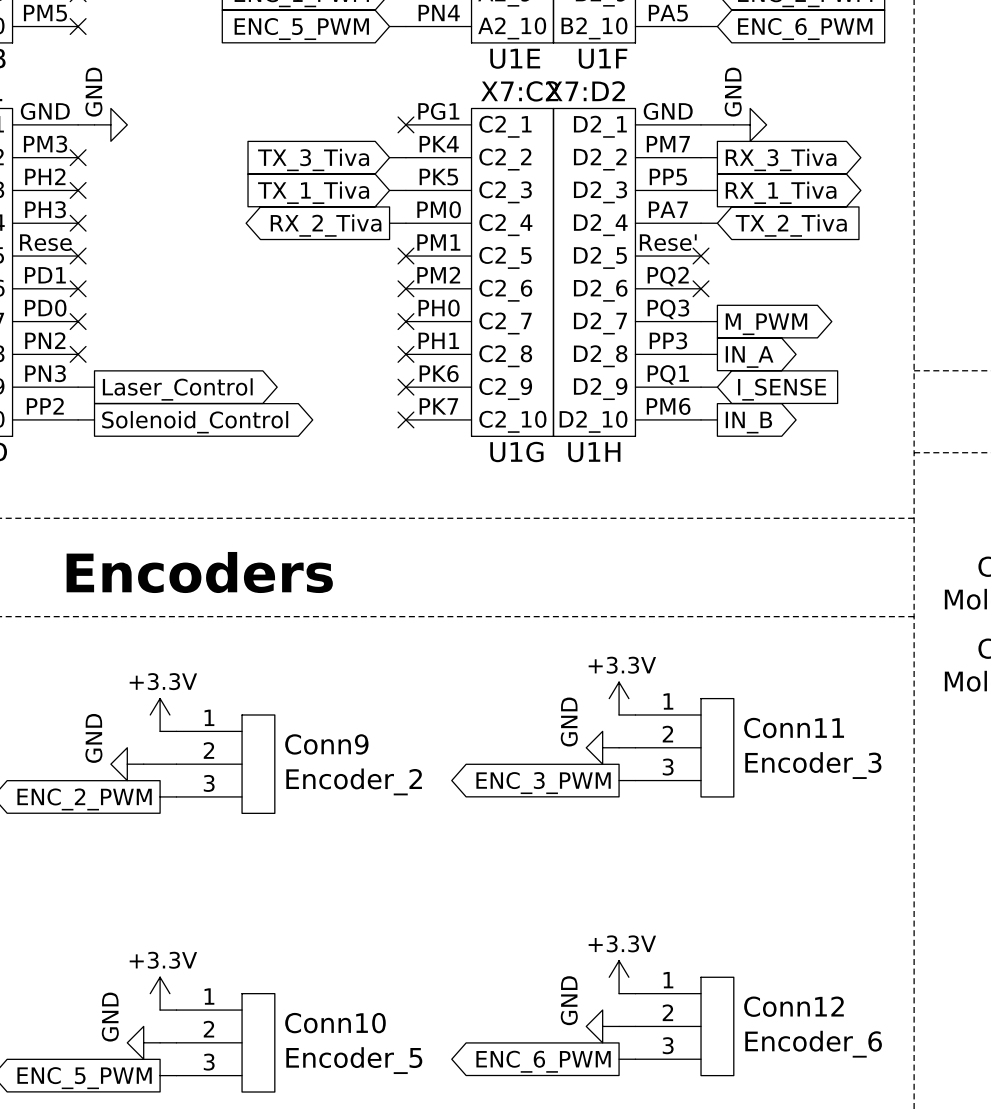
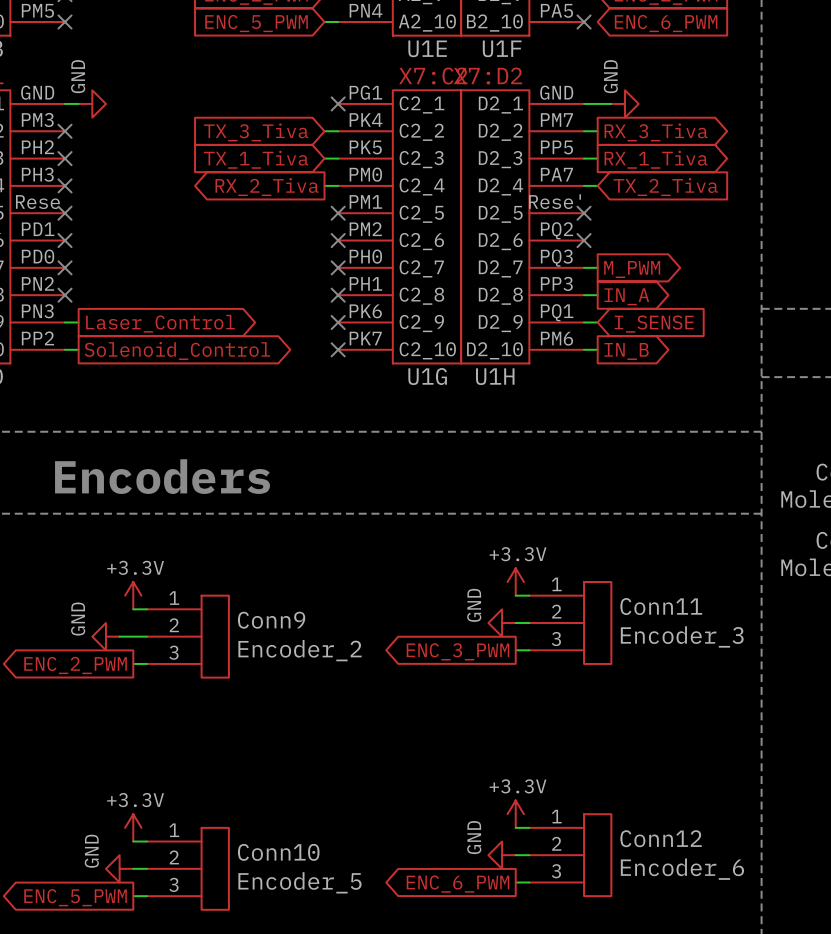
wire: (701, 26) (717, 26) -> none
no-connect mark: none -> (584, 21)

